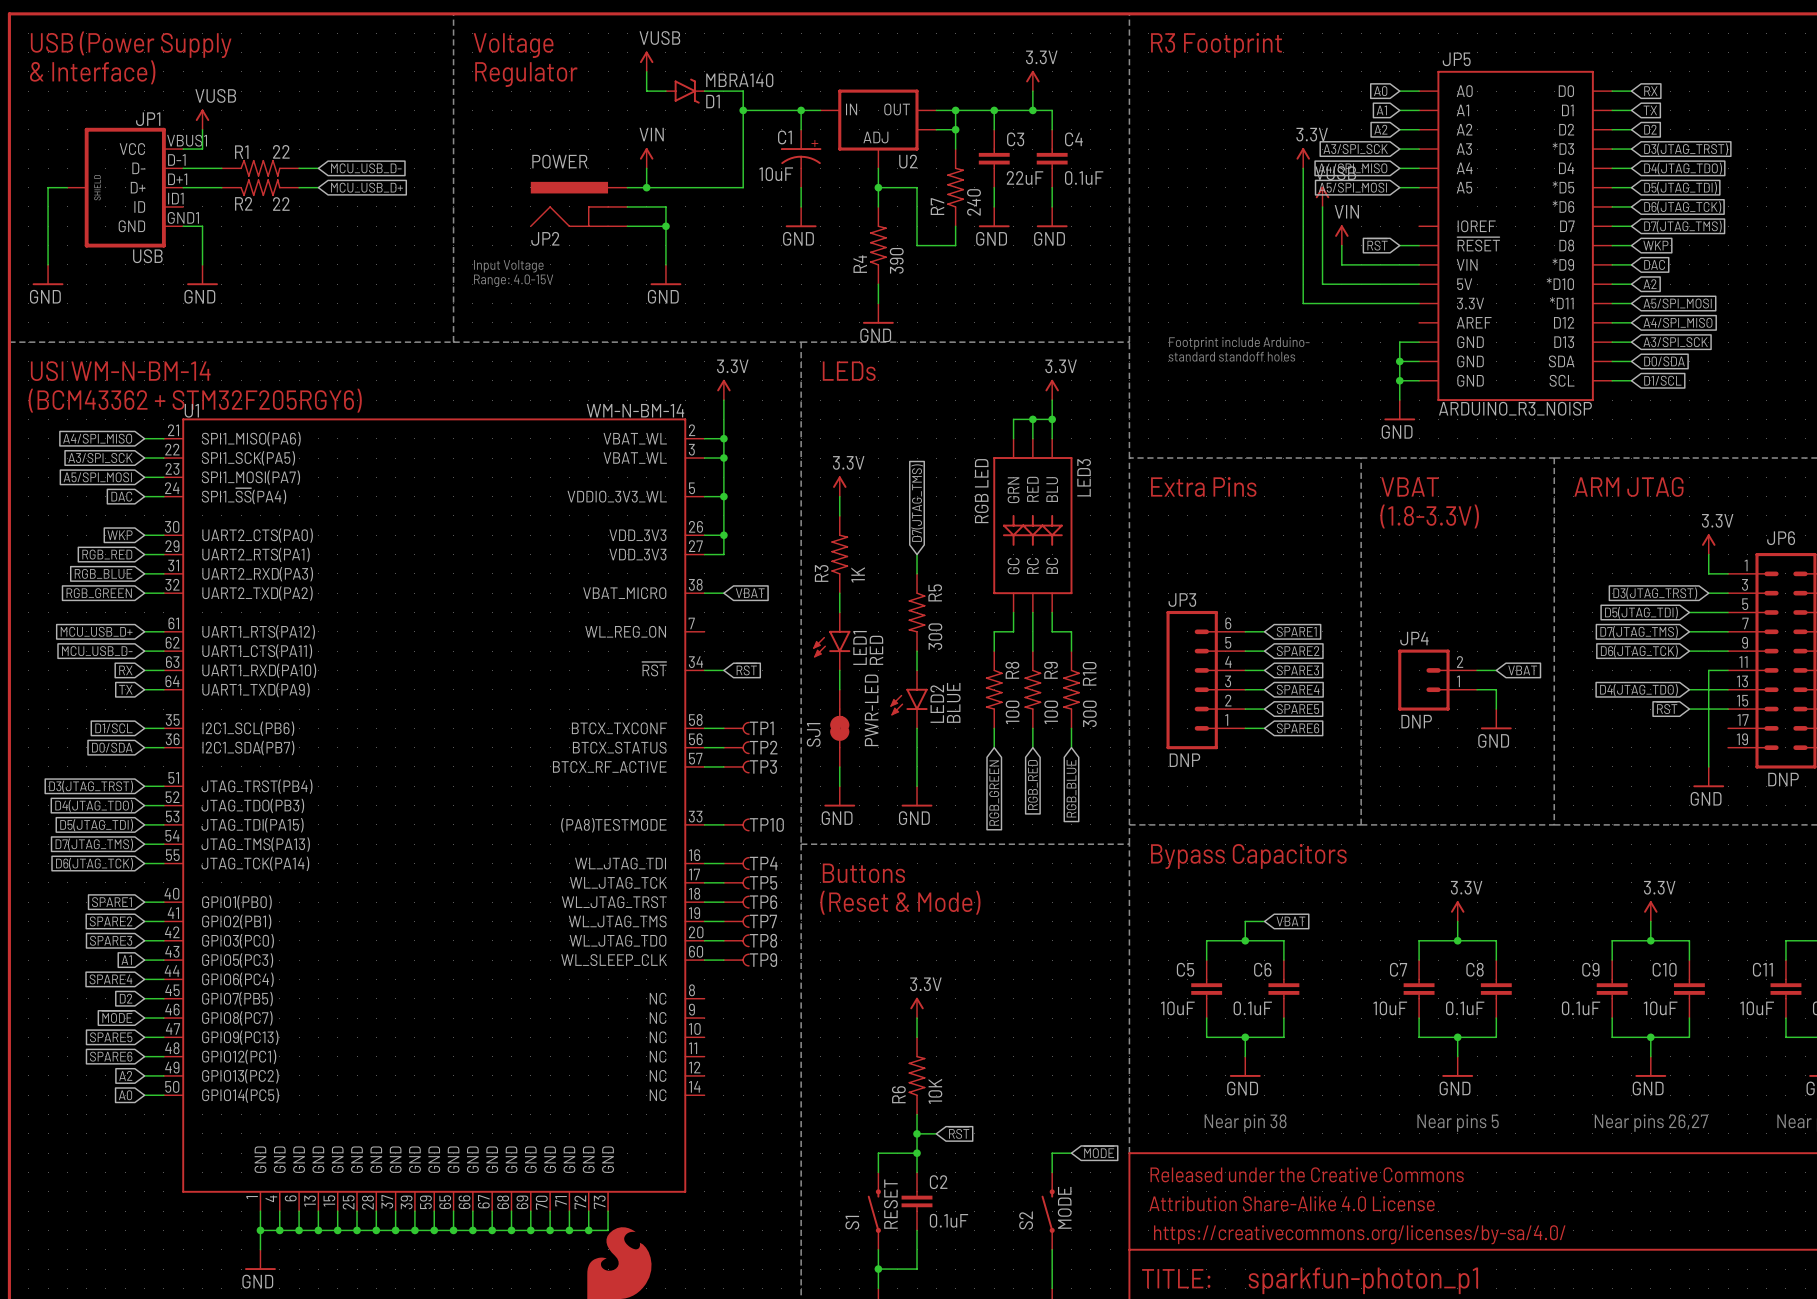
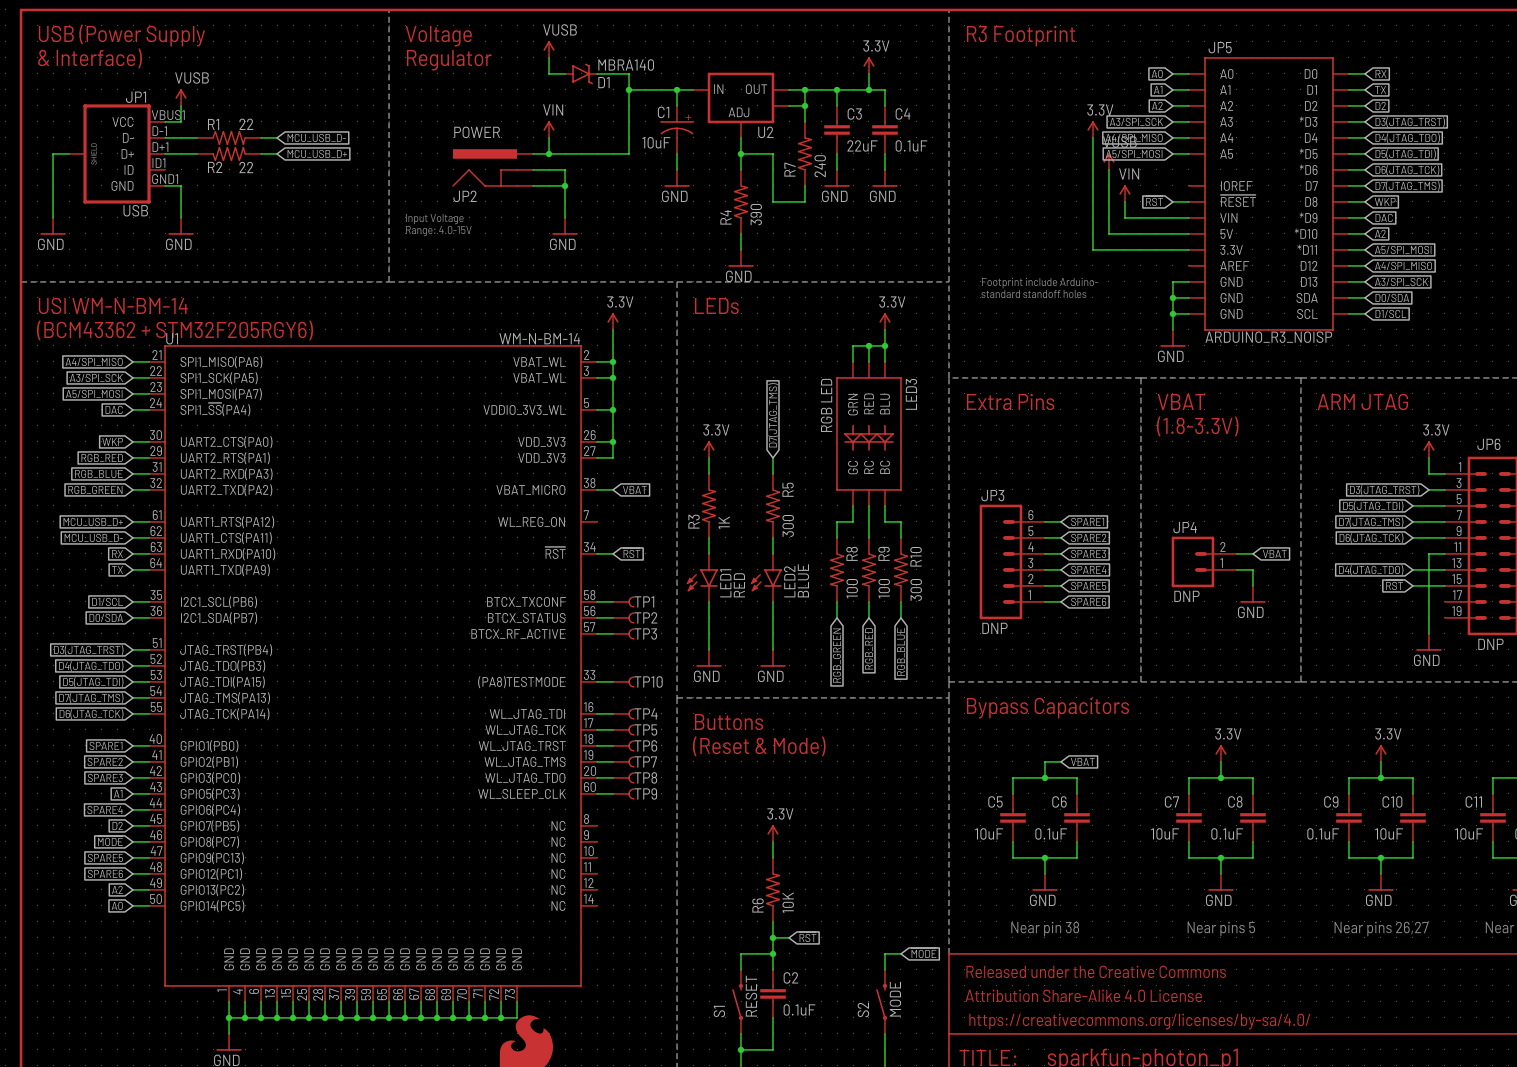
power symbol position: 3.3V (839, 486) -> 3.3V (709, 449)
wire: (839, 496) (839, 515) -> none
R3 position: (839, 554) -> (709, 505)
LED1 position: (831, 641) -> (702, 577)
SJ1: PWR-LED (839, 728) -> none

